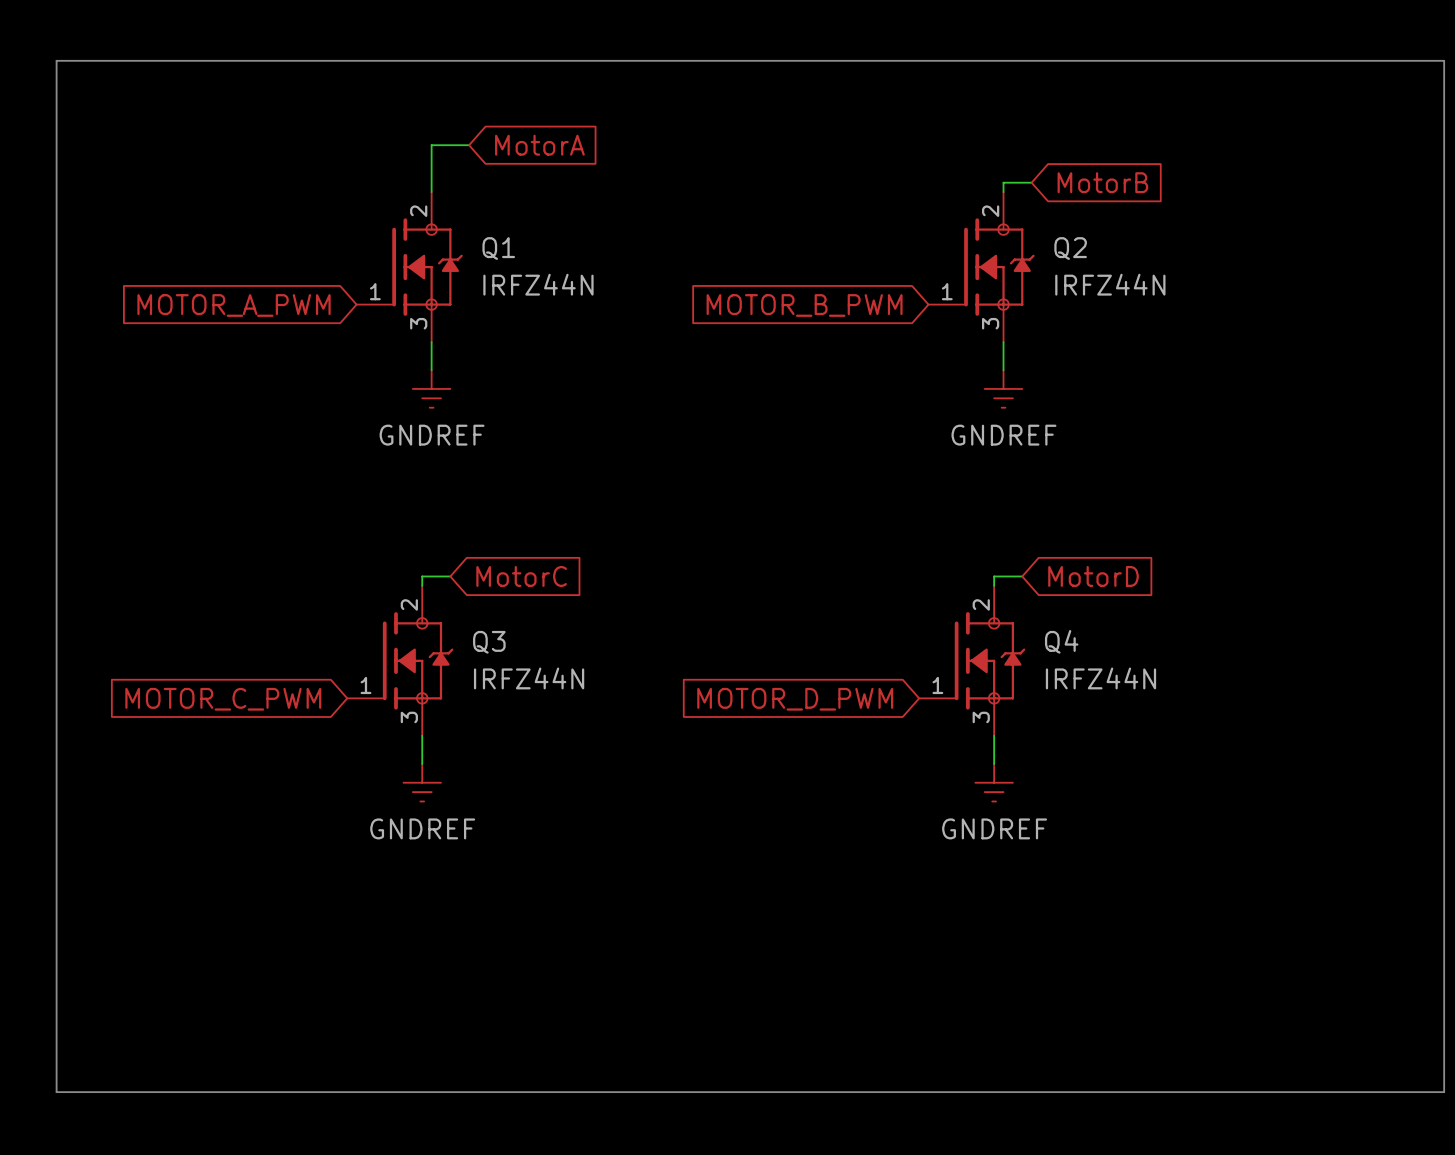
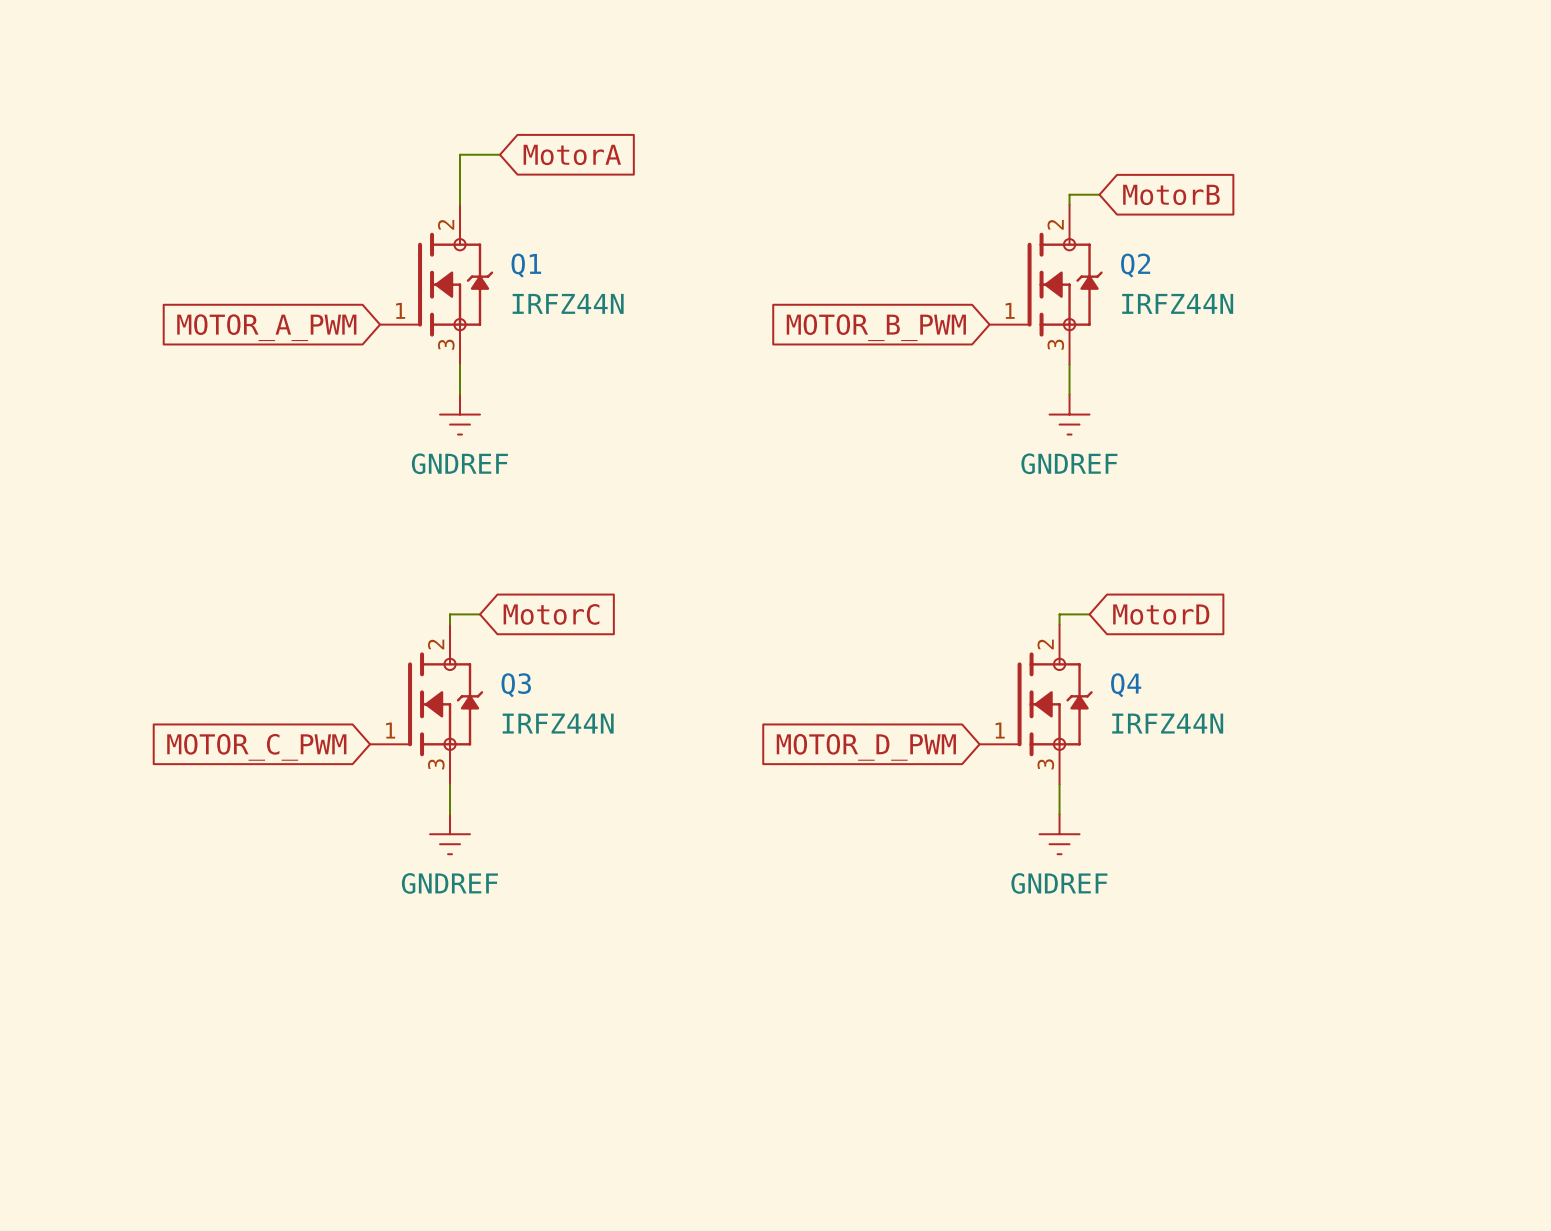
line: (56, 60) (1444, 60) (1444, 1092) (56, 1092) (56, 60) -> none

